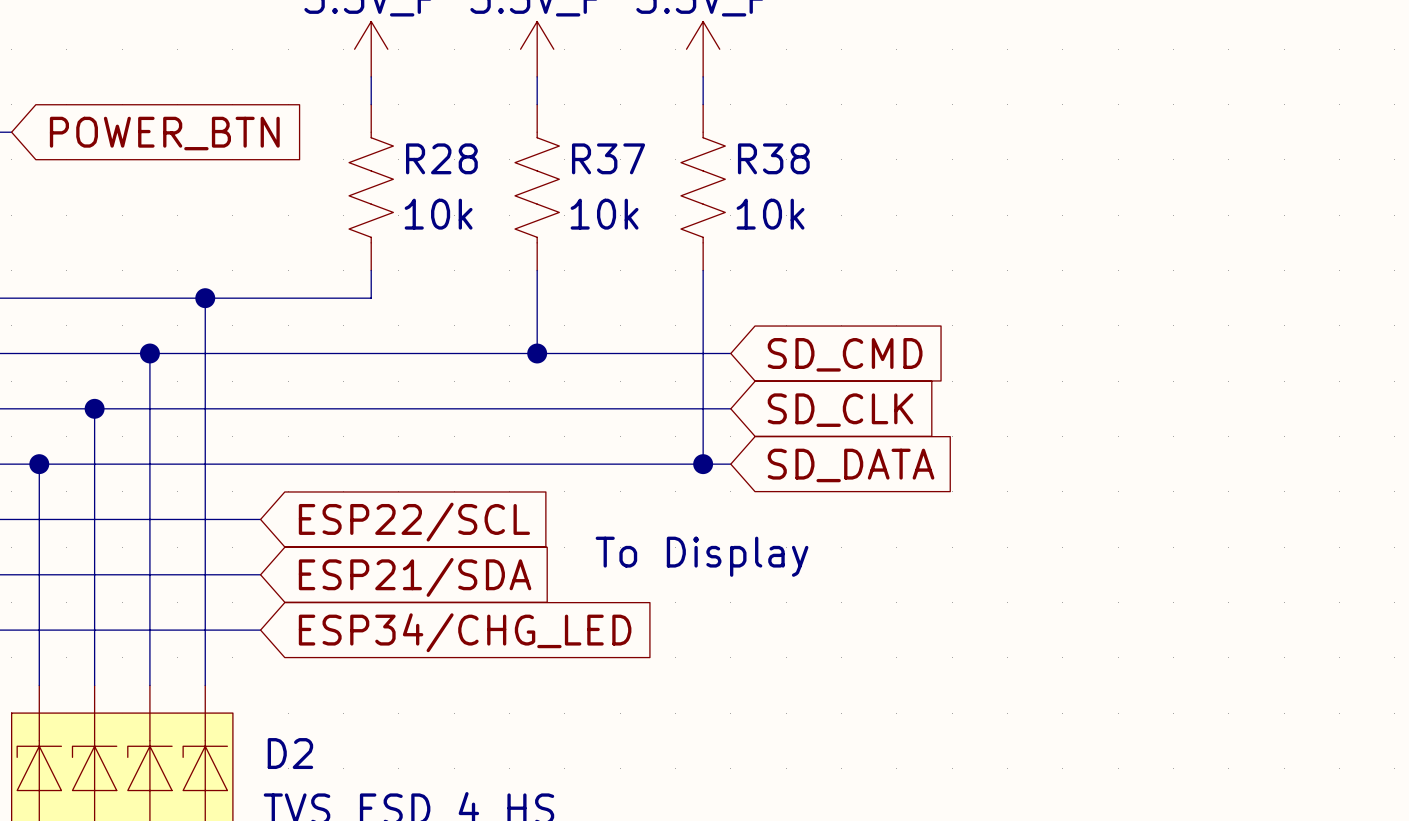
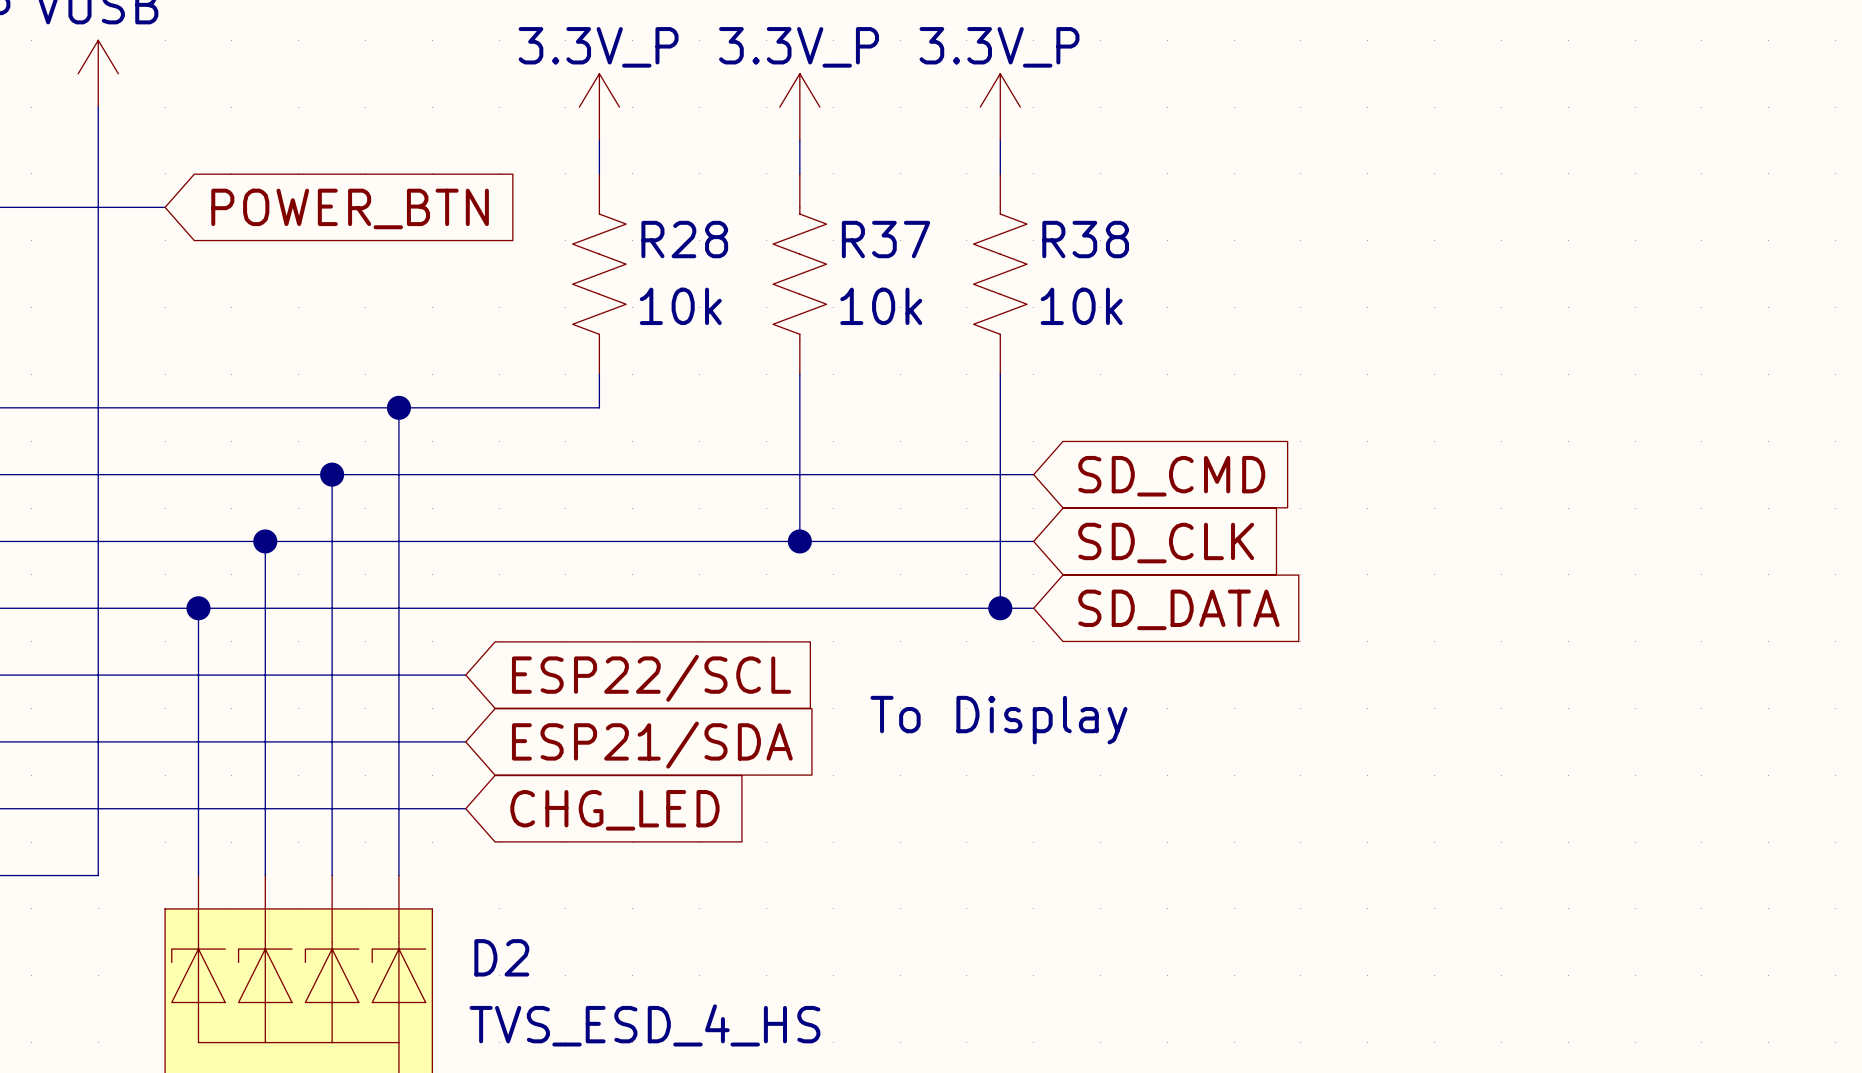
wire: none -> (799, 474) (799, 541)
junction position: (537, 353) -> (799, 541)
global label: ESP34/CHG_LED (465, 632) -> CHG_LED (614, 810)

